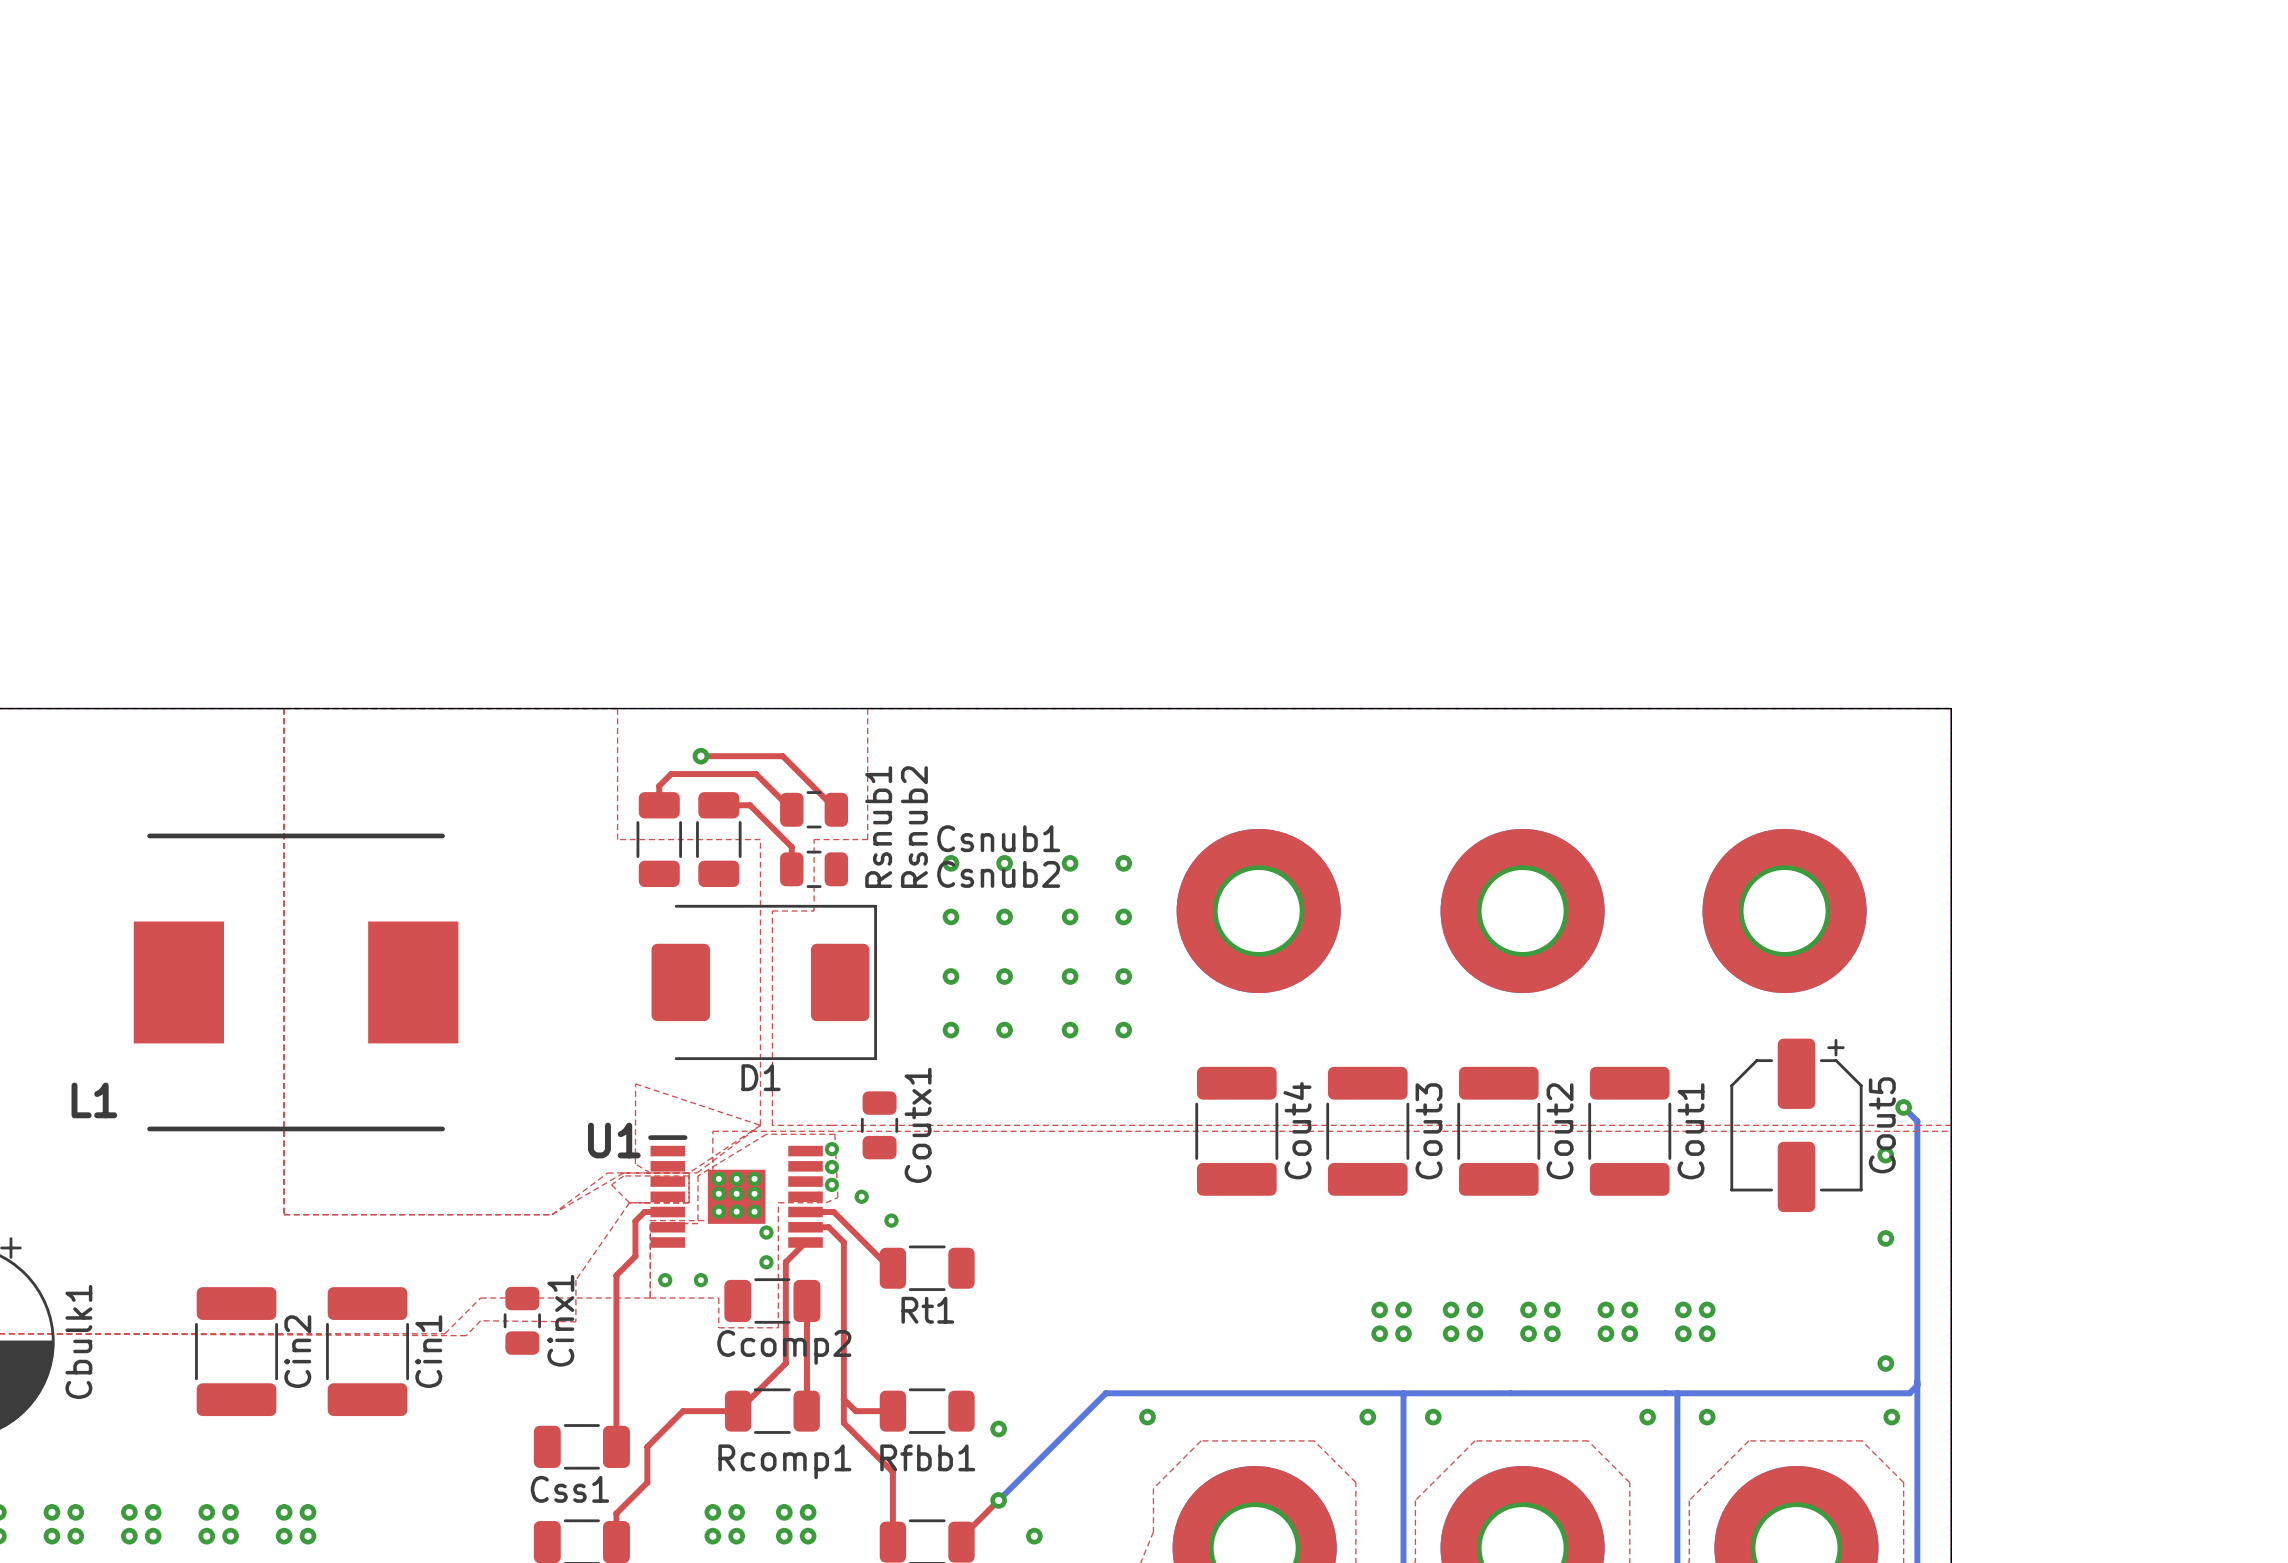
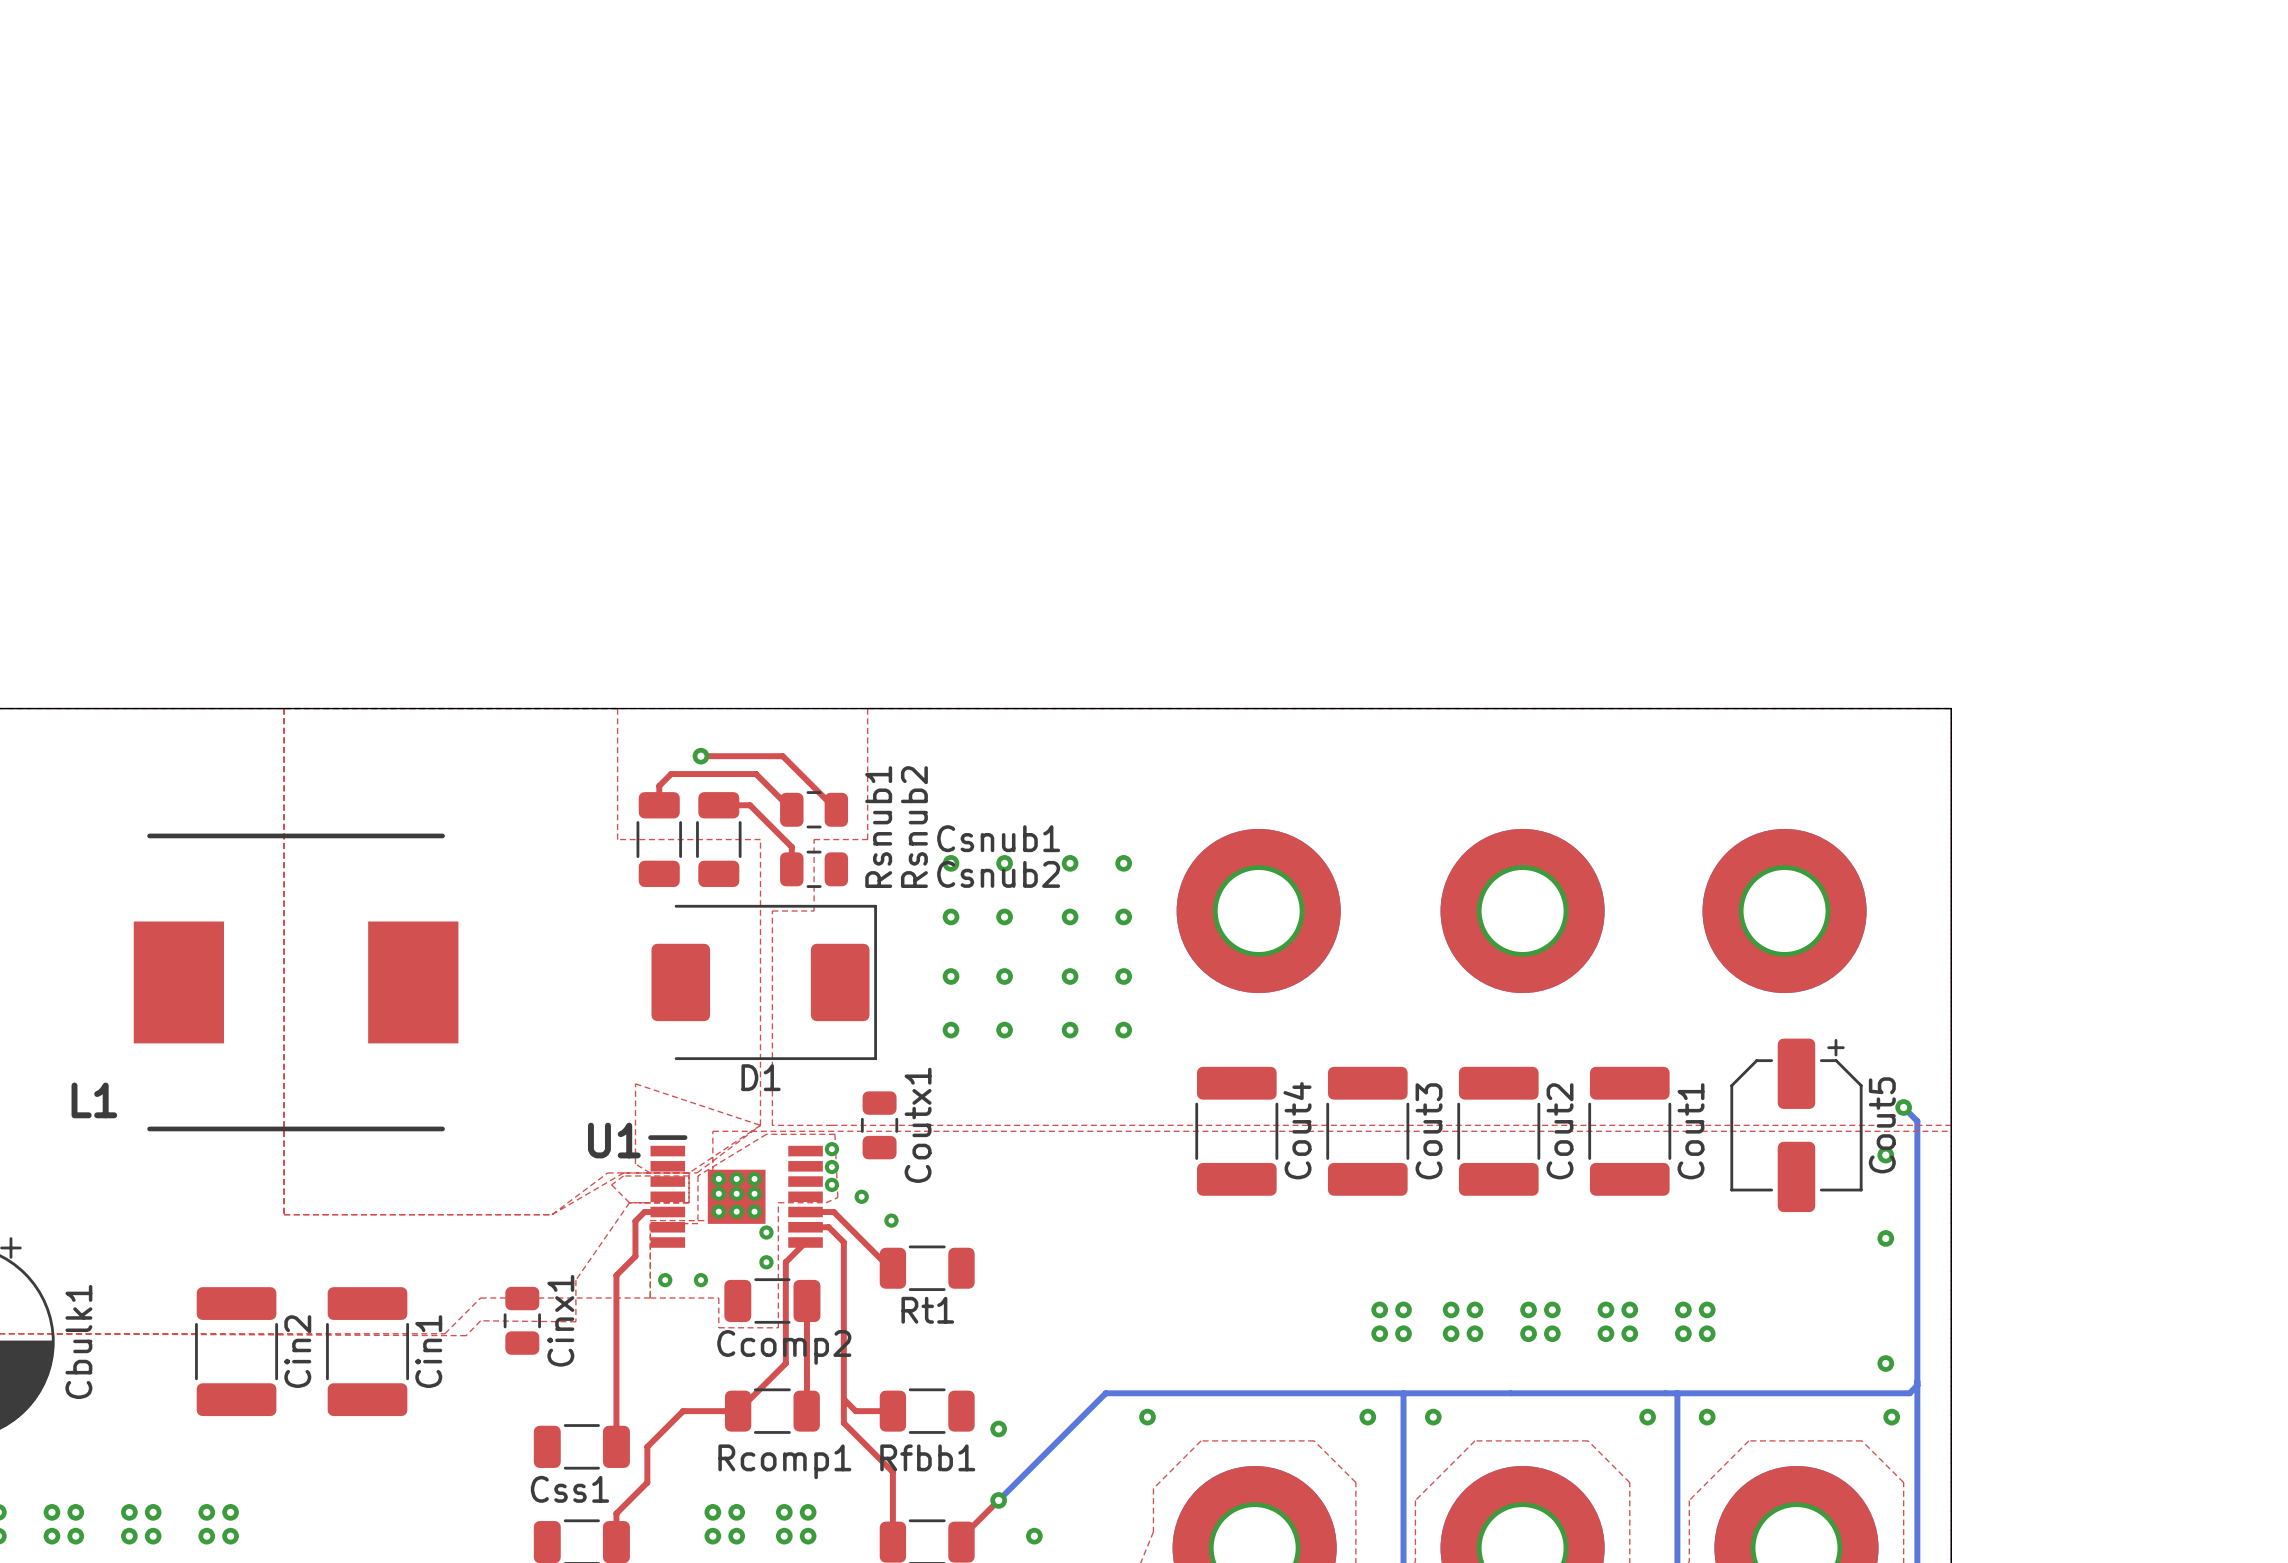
via: (284, 1512) -> none
via: (307, 1512) -> none
via: (284, 1536) -> none
via: (307, 1536) -> none

